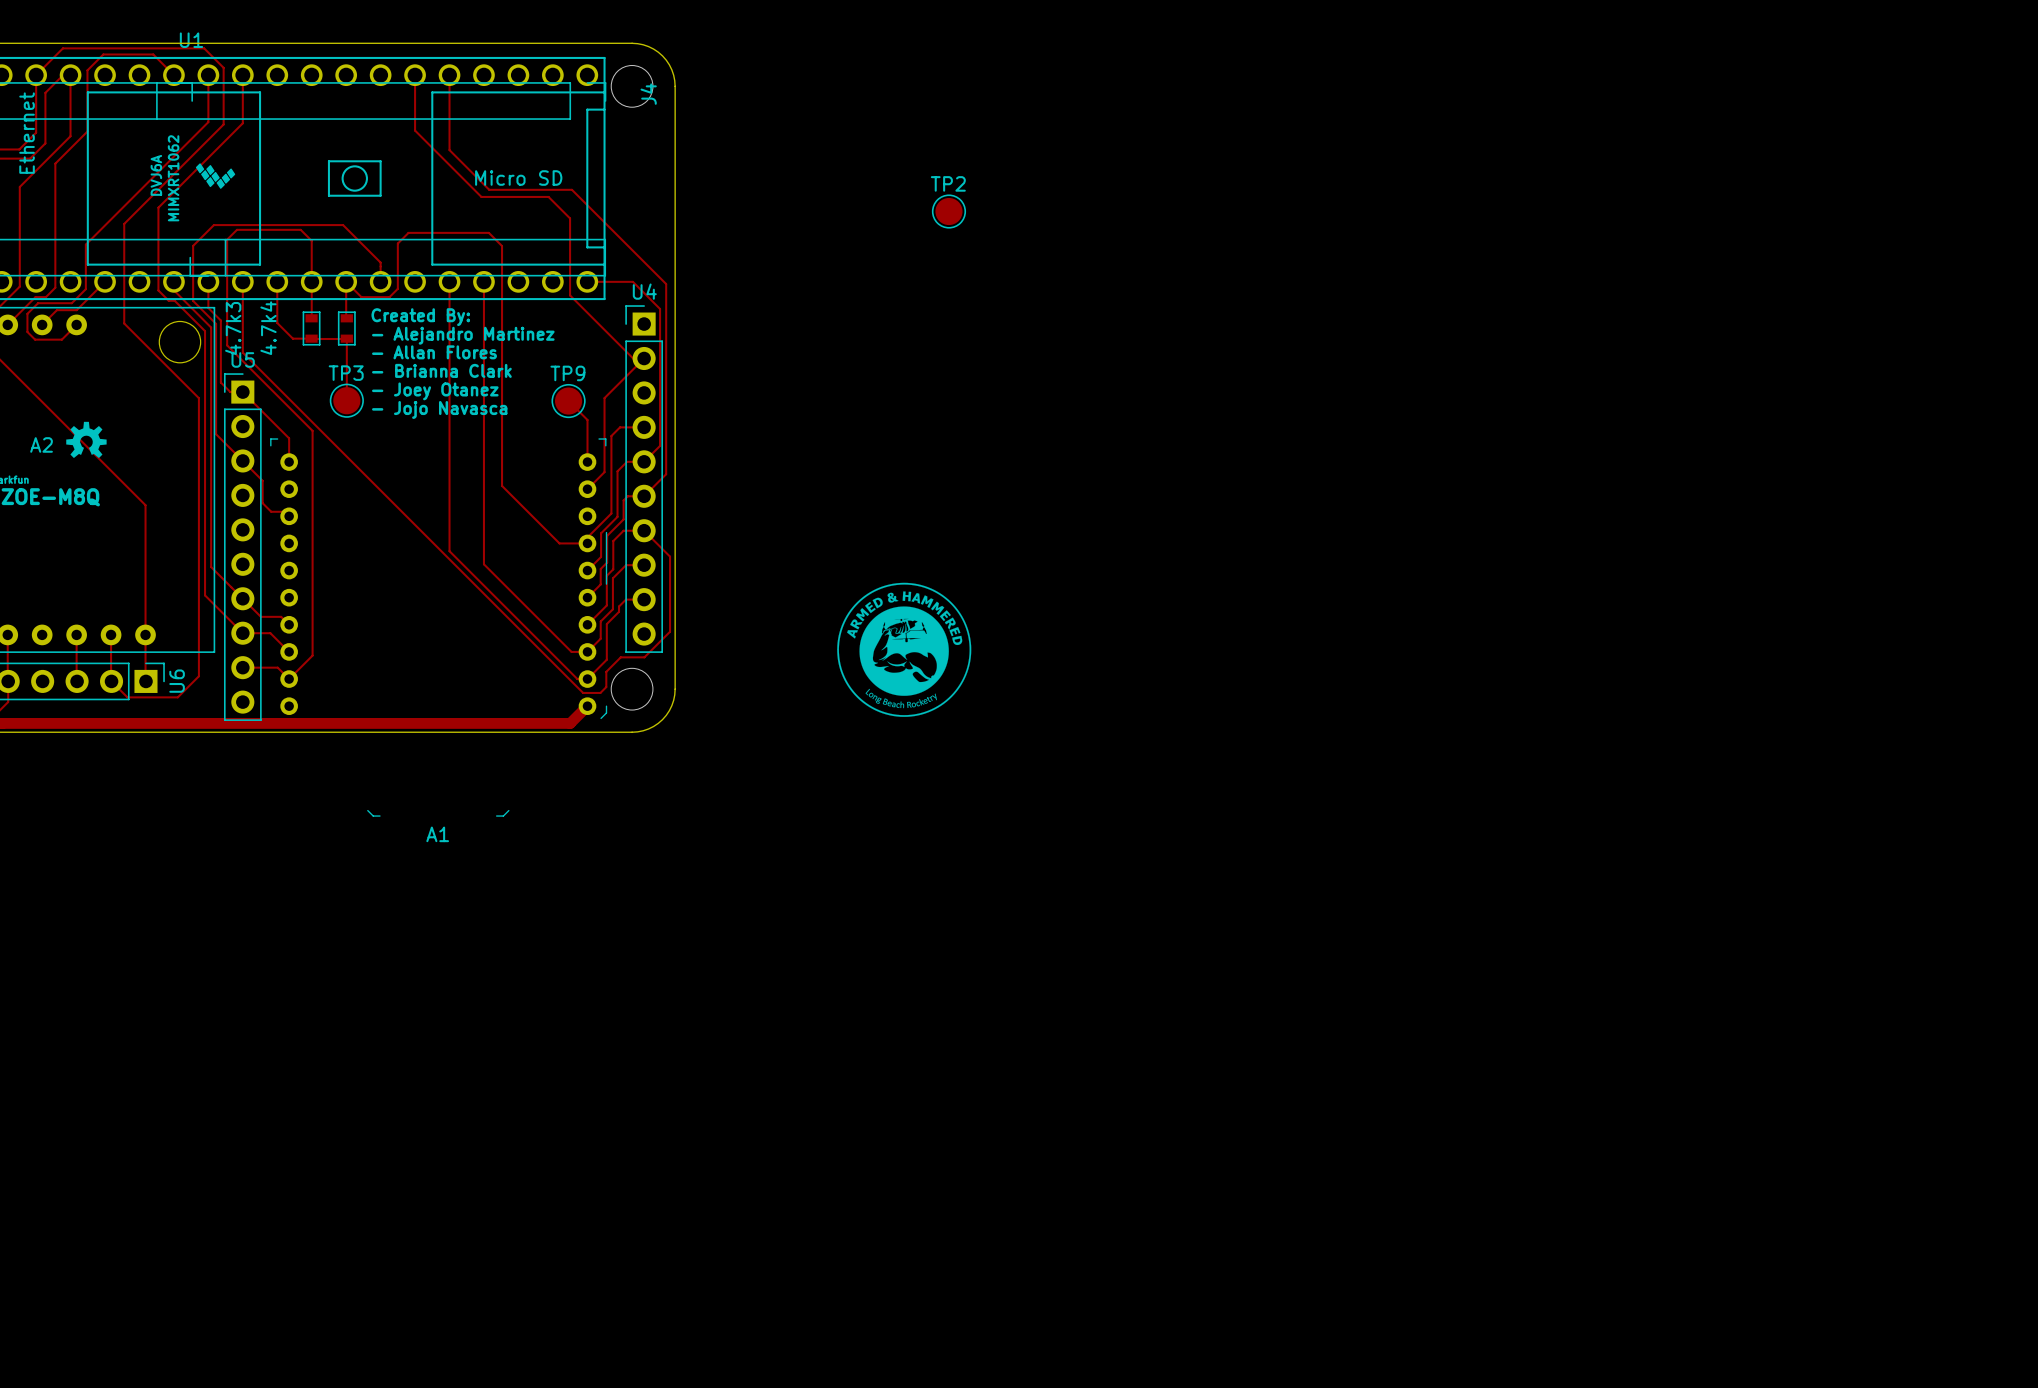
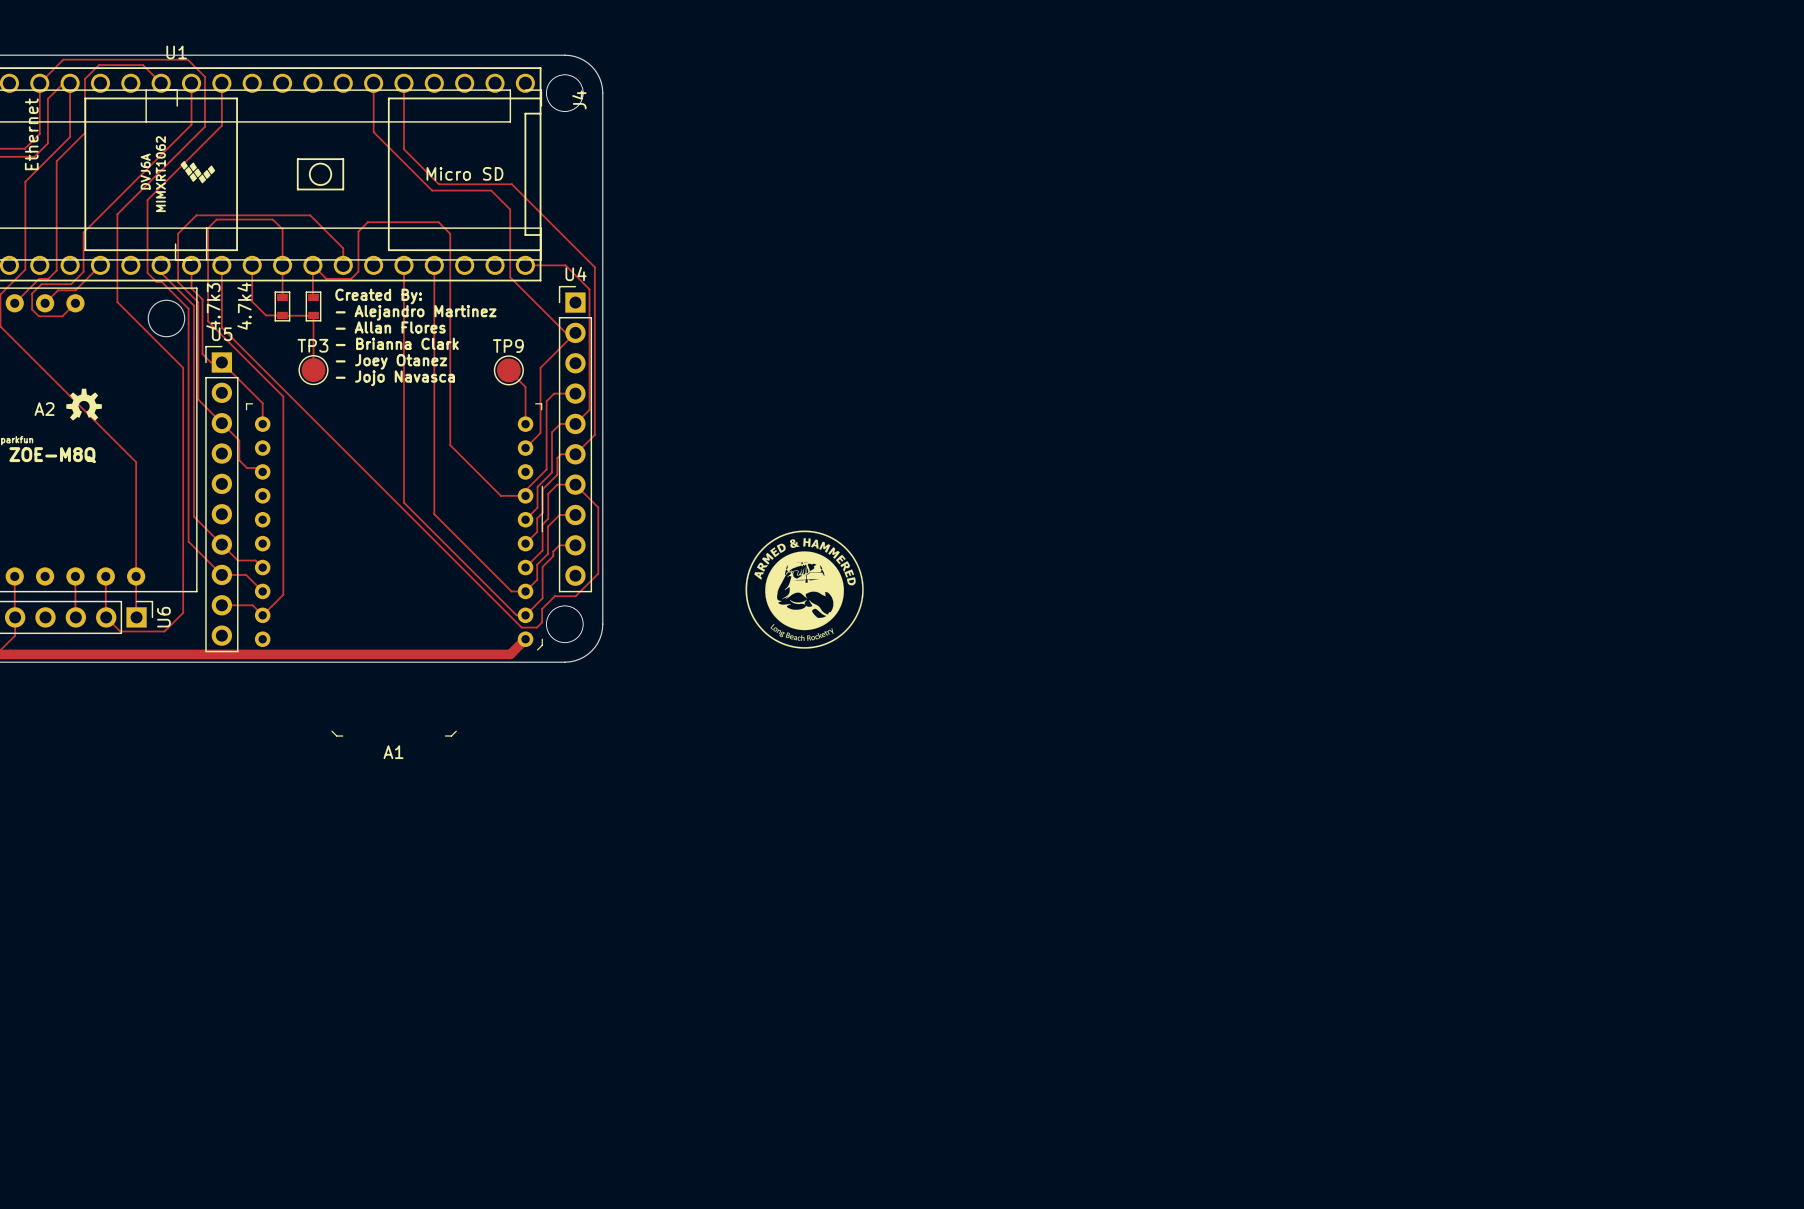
TP2: (948, 211) -> none

